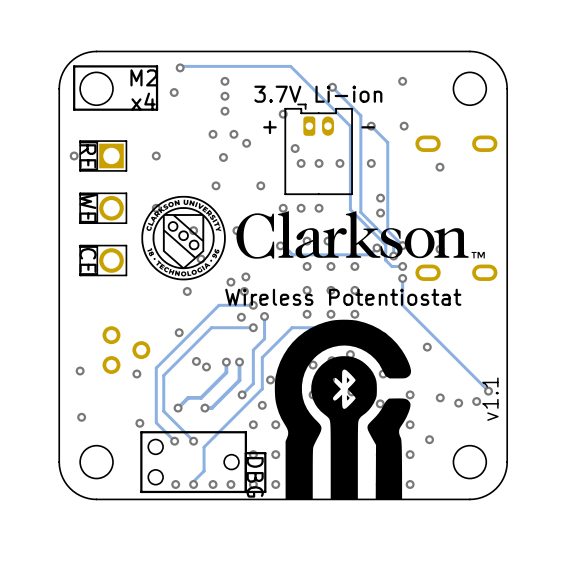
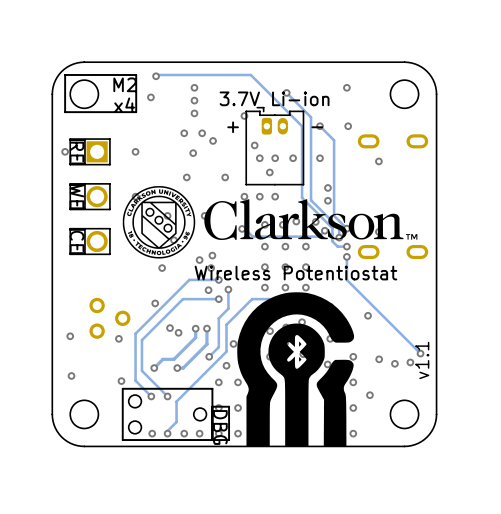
via: none -> (269, 172)
via: none -> (296, 221)
via: none -> (315, 221)

